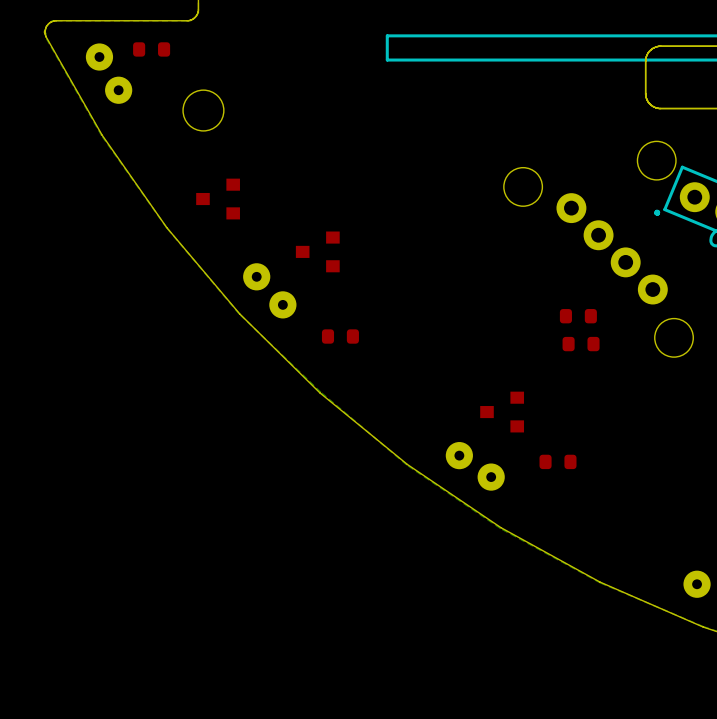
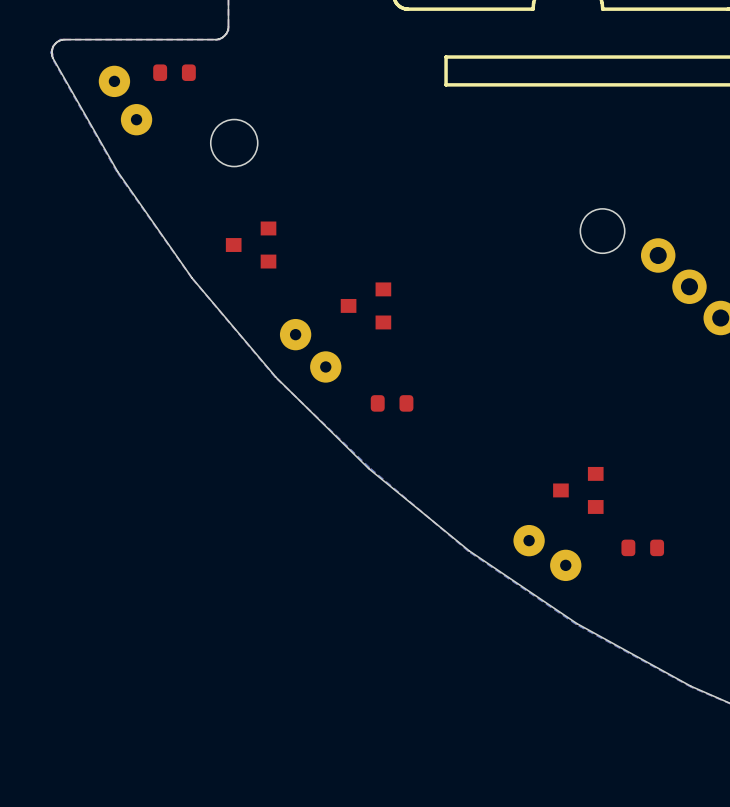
part: (578, 316) -> none
part: (581, 344) -> none

